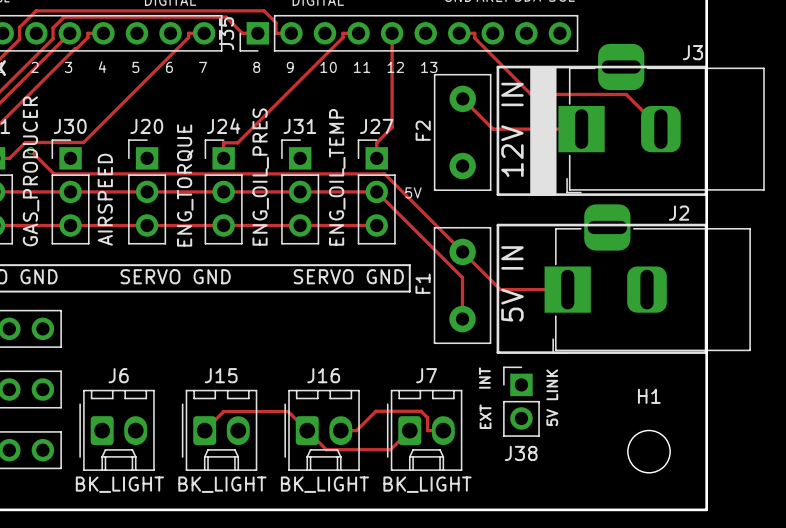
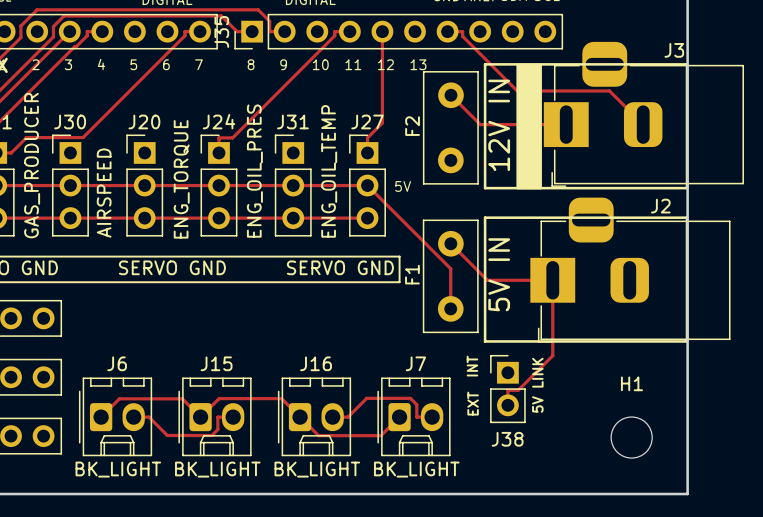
track: (30, 150) (53, 173) (384, 173) (462, 251) -> none
via: (30, 150) -> none
track: none -> (552, 280) (552, 355) (518, 390) (507, 390) (507, 405)
track: none -> (101, 417) (119, 398) (182, 398) (200, 417)
track: none -> (133, 417) (149, 417) (167, 435) (211, 435) (217, 429) (217, 417) (233, 417)

